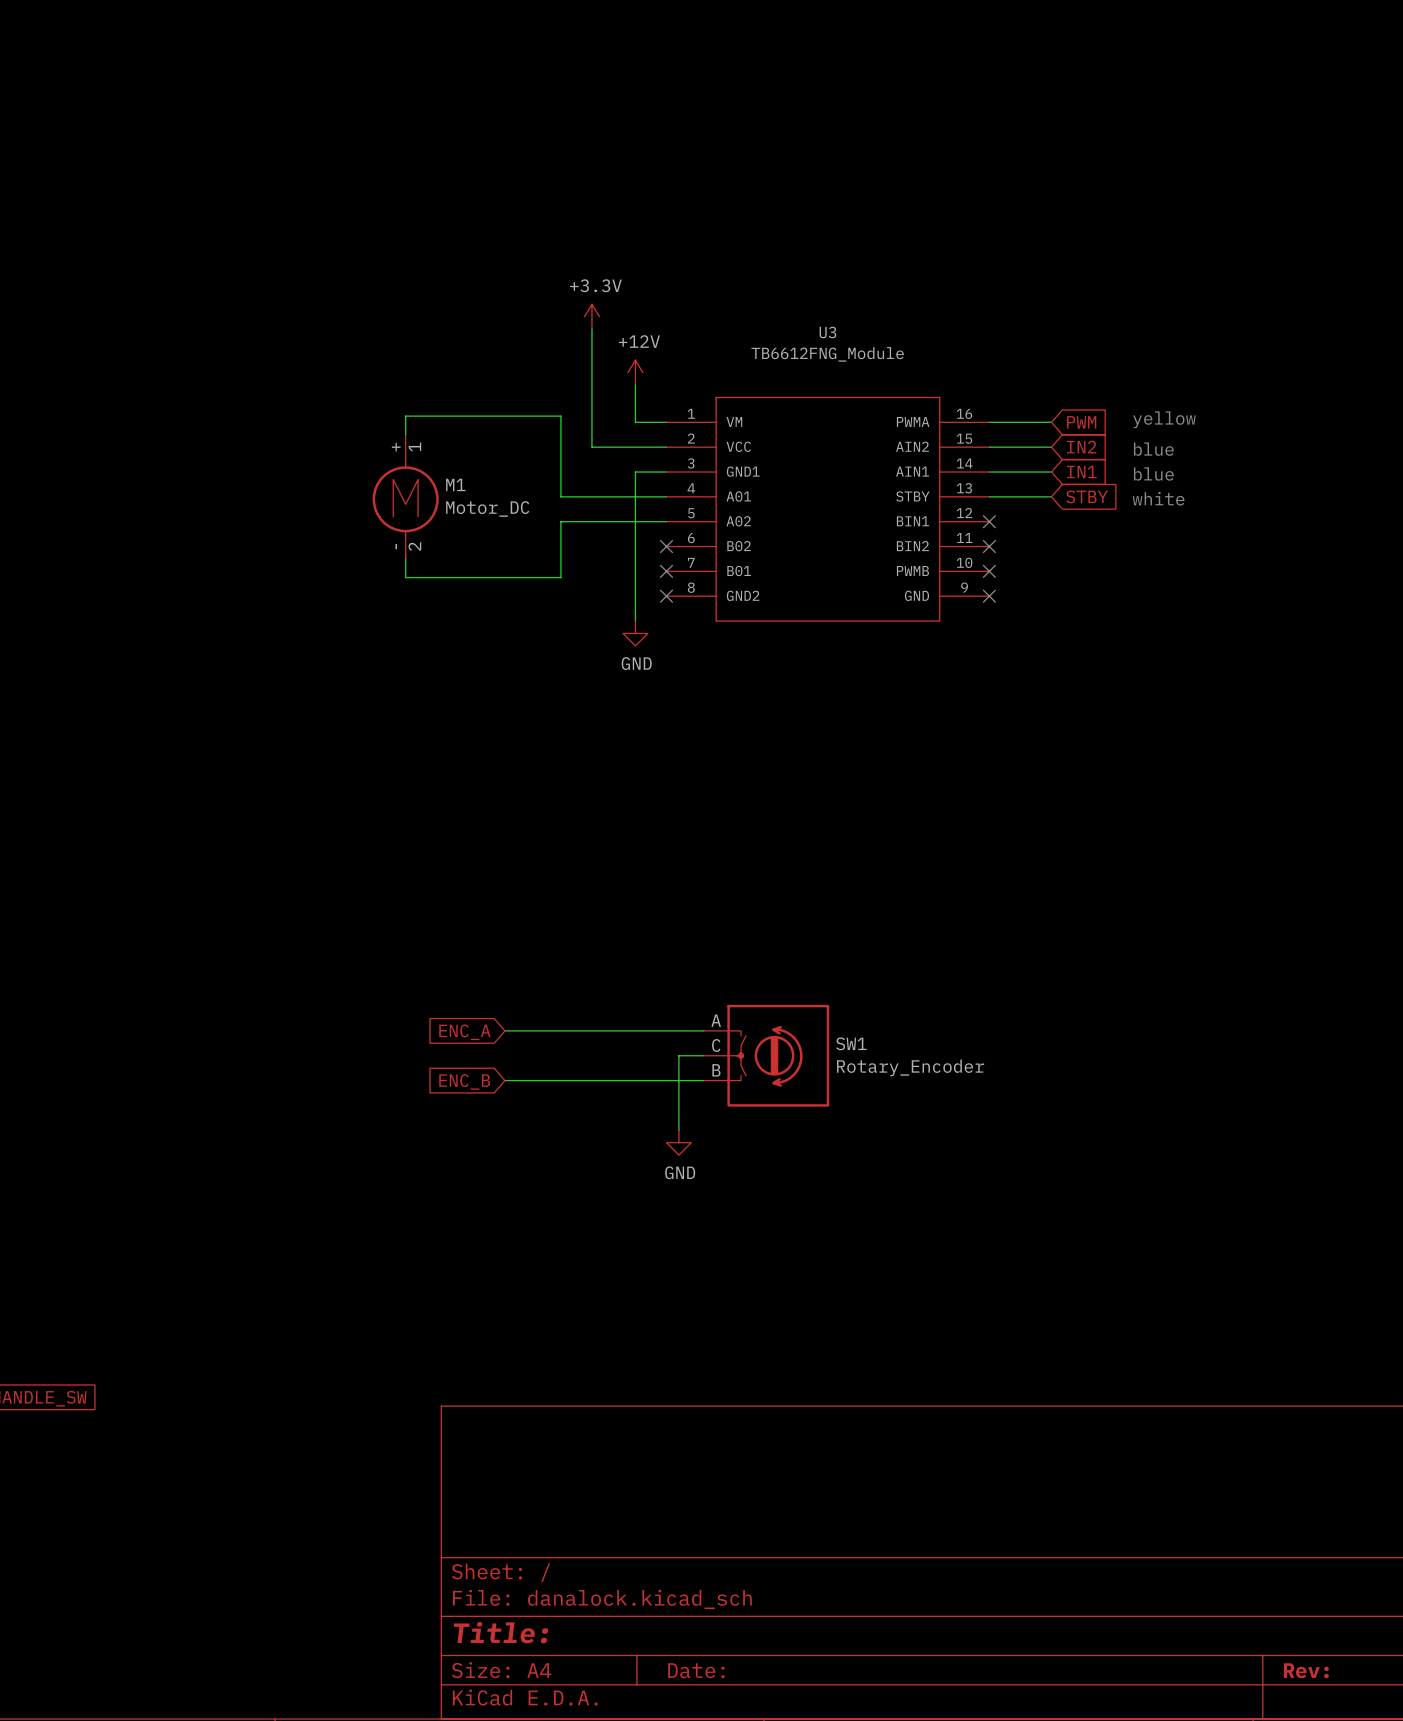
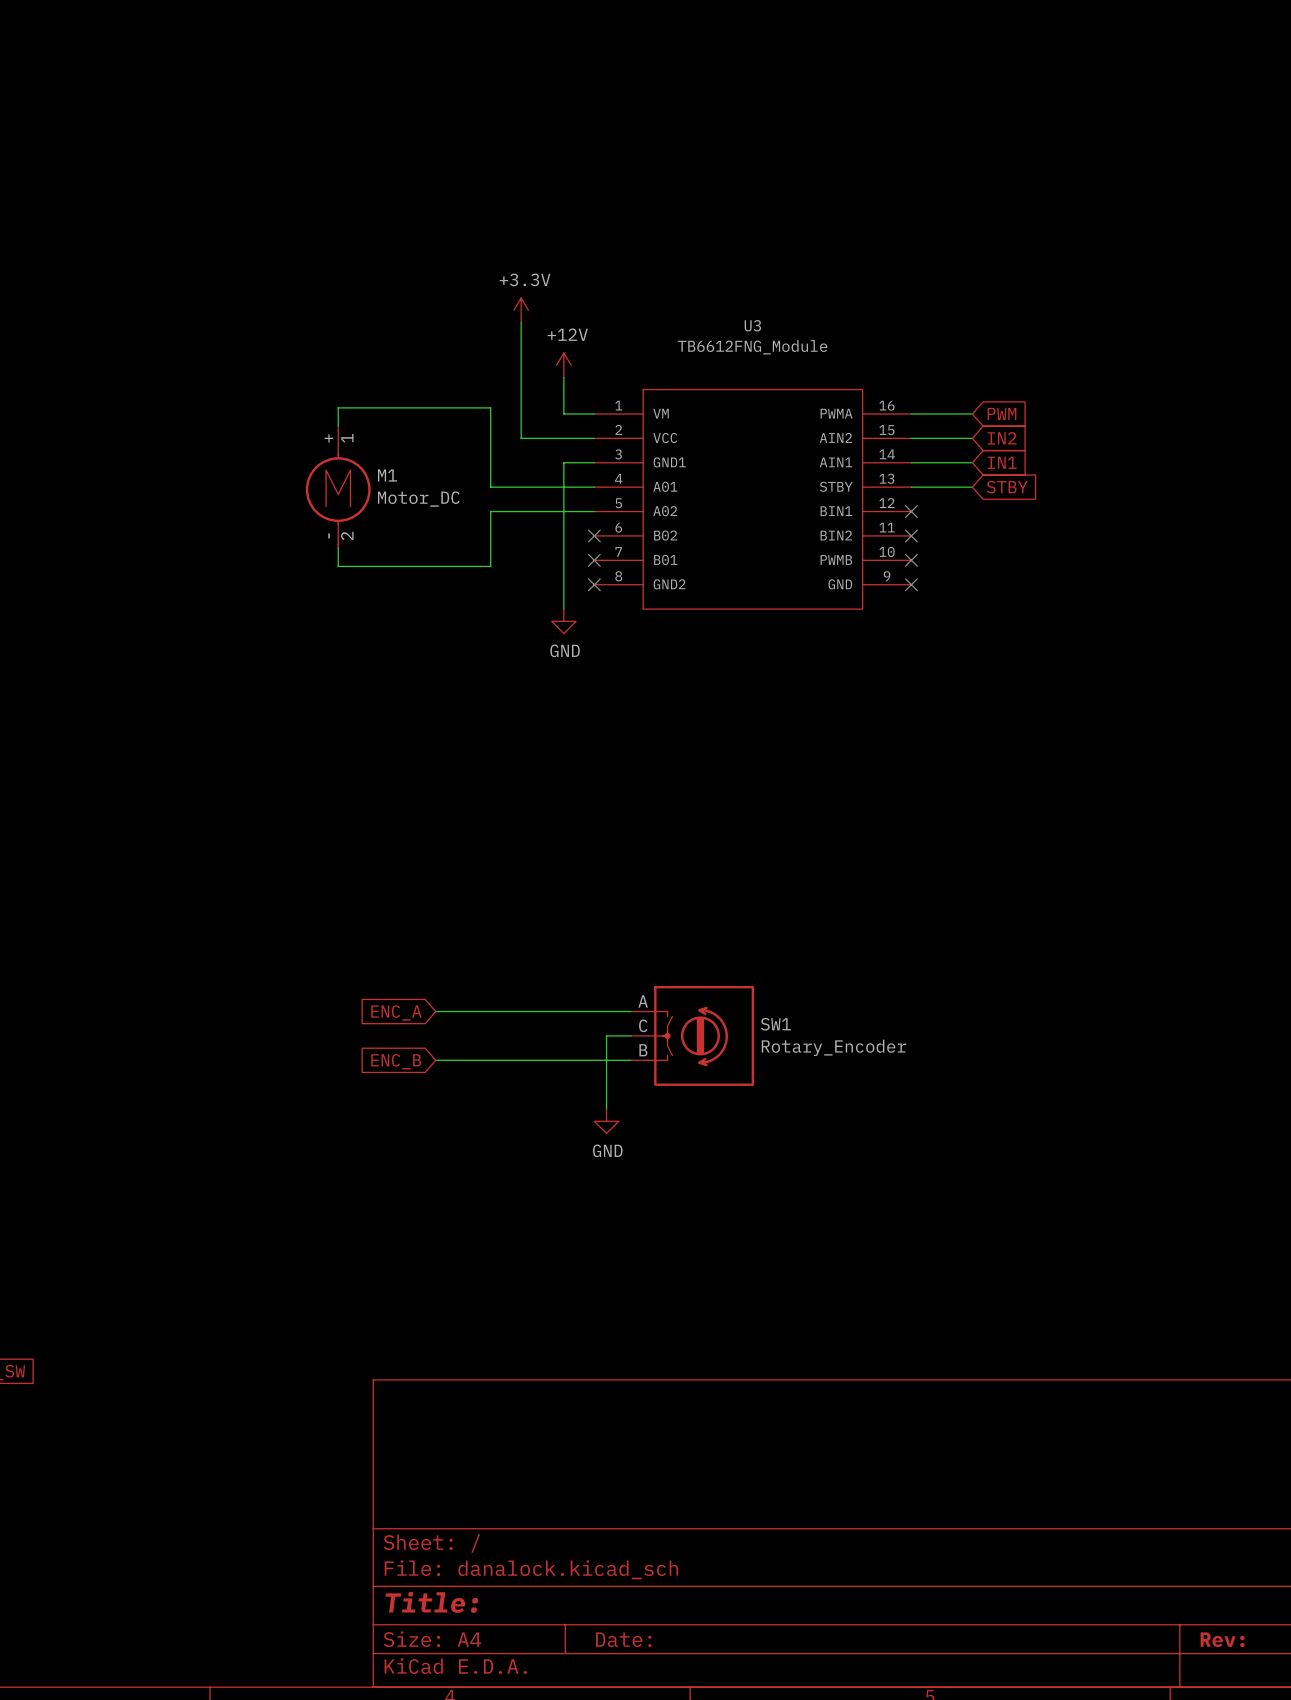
text: yellow (1164, 419) -> none
text: blue (1153, 449) -> none
text: blue (1153, 473) -> none
text: white (1158, 498) -> none

